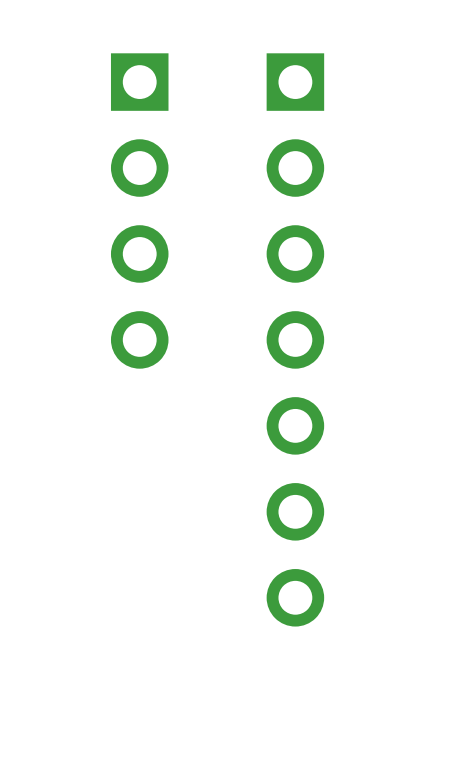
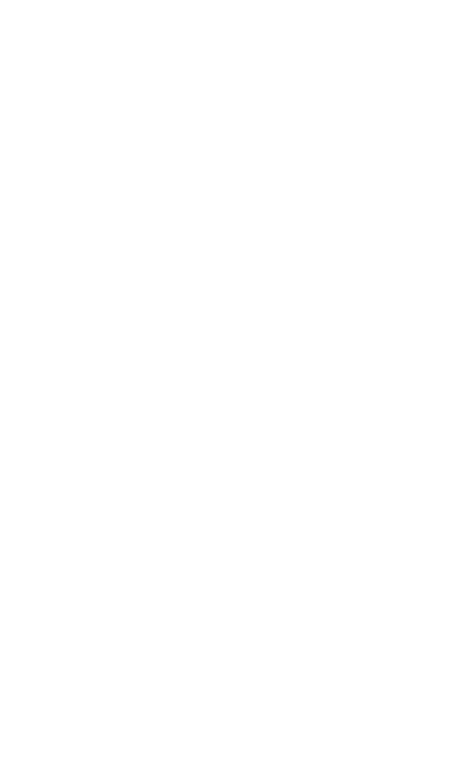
part: (139, 210) -> none
part: (295, 339) -> none

